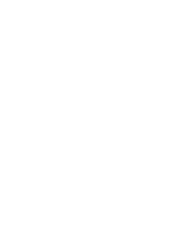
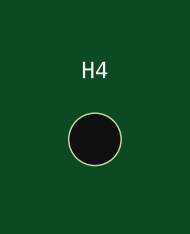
H4: none -> (94, 139)

